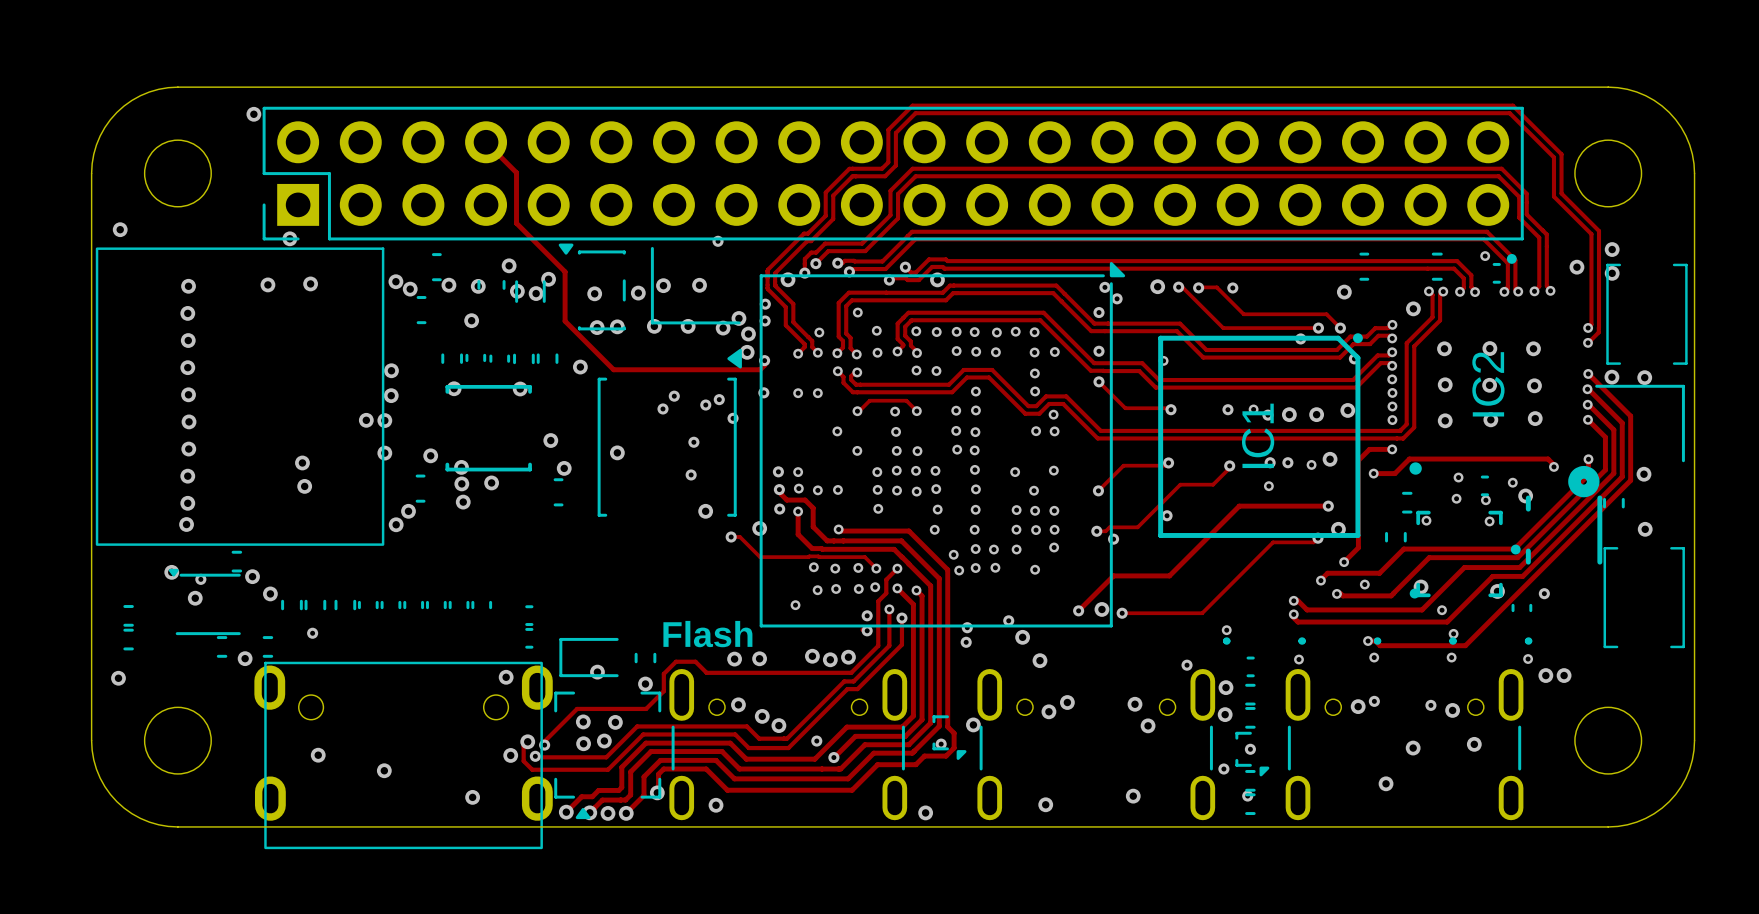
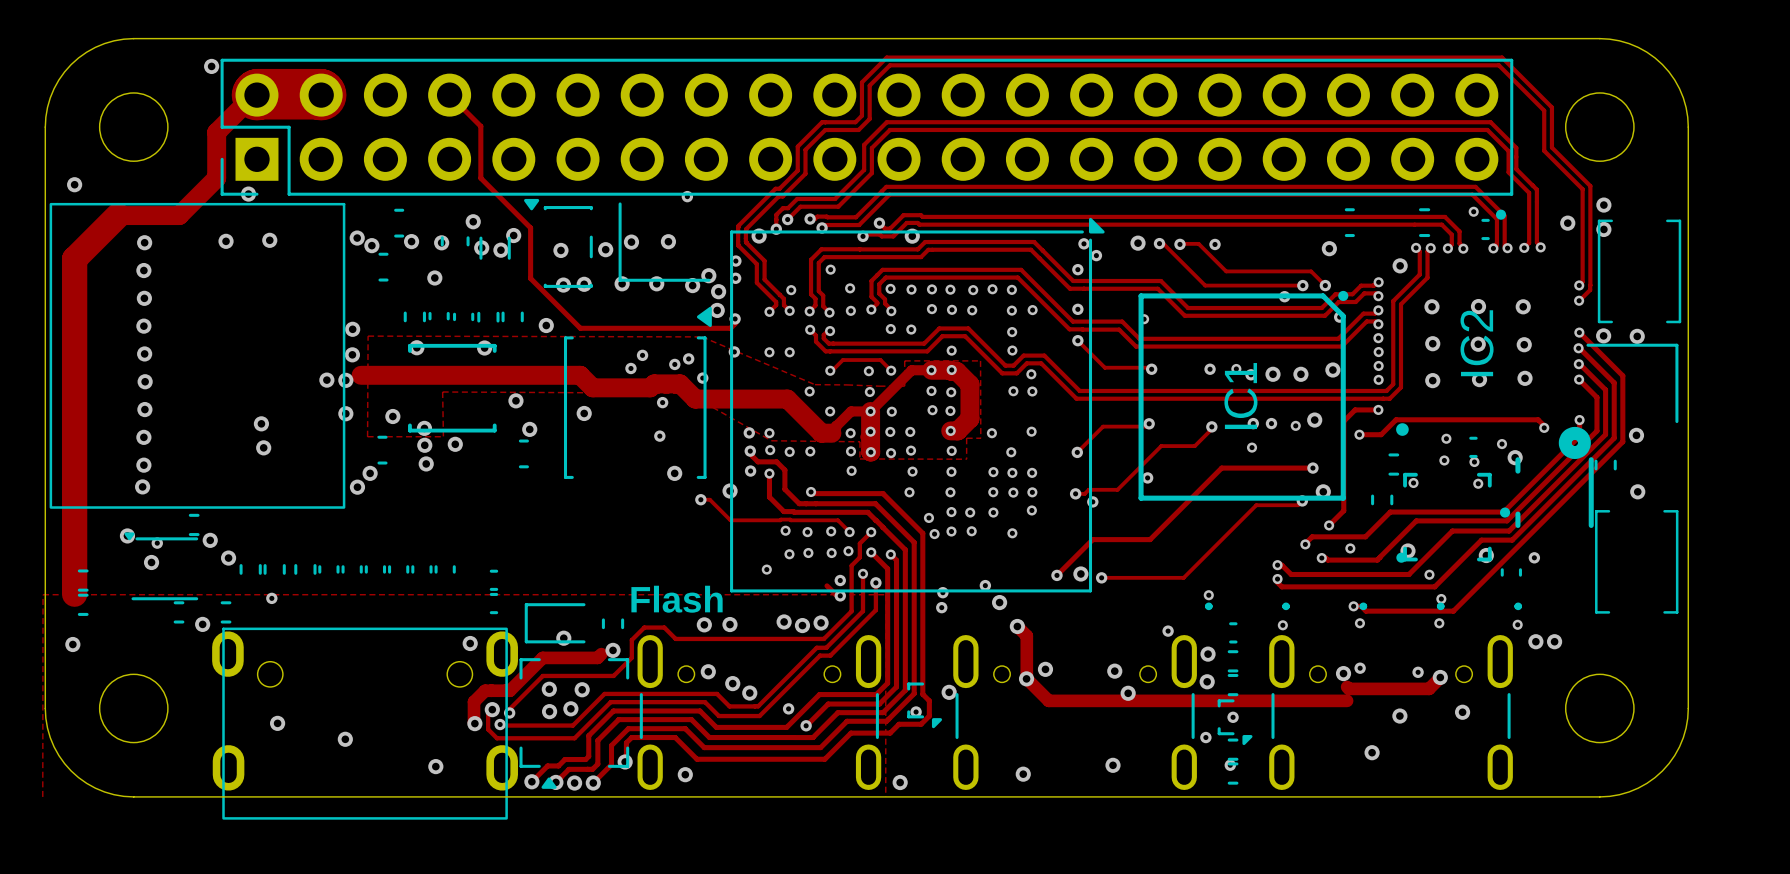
track: none -> (253, 95) (216, 132) (216, 178) (179, 215) (118, 215) (74, 259) (74, 594)
track: none -> (256, 95) (321, 95)
zone outline: none -> (368, 336) (367, 436) (443, 436) (442, 391) (687, 393) (771, 440) (859, 441) (859, 458) (966, 459) (966, 438) (980, 438) (980, 360) (904, 360) (904, 386) (814, 384) (701, 336) (368, 336)
track: none -> (361, 375) (580, 375) (592, 387) (650, 387) (654, 383) (680, 383) (695, 399) (787, 399) (821, 433) (831, 433)
track: none -> (870, 411) (870, 451)
track: none -> (870, 411) (851, 411) (831, 430) (831, 433)
track: none -> (870, 411) (911, 370) (956, 371) (969, 384) (969, 418) (957, 430) (950, 430)
track: none -> (826, 585) (835, 594)
track: none -> (1017, 626) (1026, 635) (1026, 678) (1048, 700) (1347, 700)
track: none -> (601, 654) (597, 657) (542, 657) (509, 690) (485, 690) (474, 701) (474, 723)
track: none -> (1440, 677) (1429, 688) (1349, 688) (1347, 686)
zone outline: none -> (42, 796) (43, 594) (885, 594) (885, 796)

